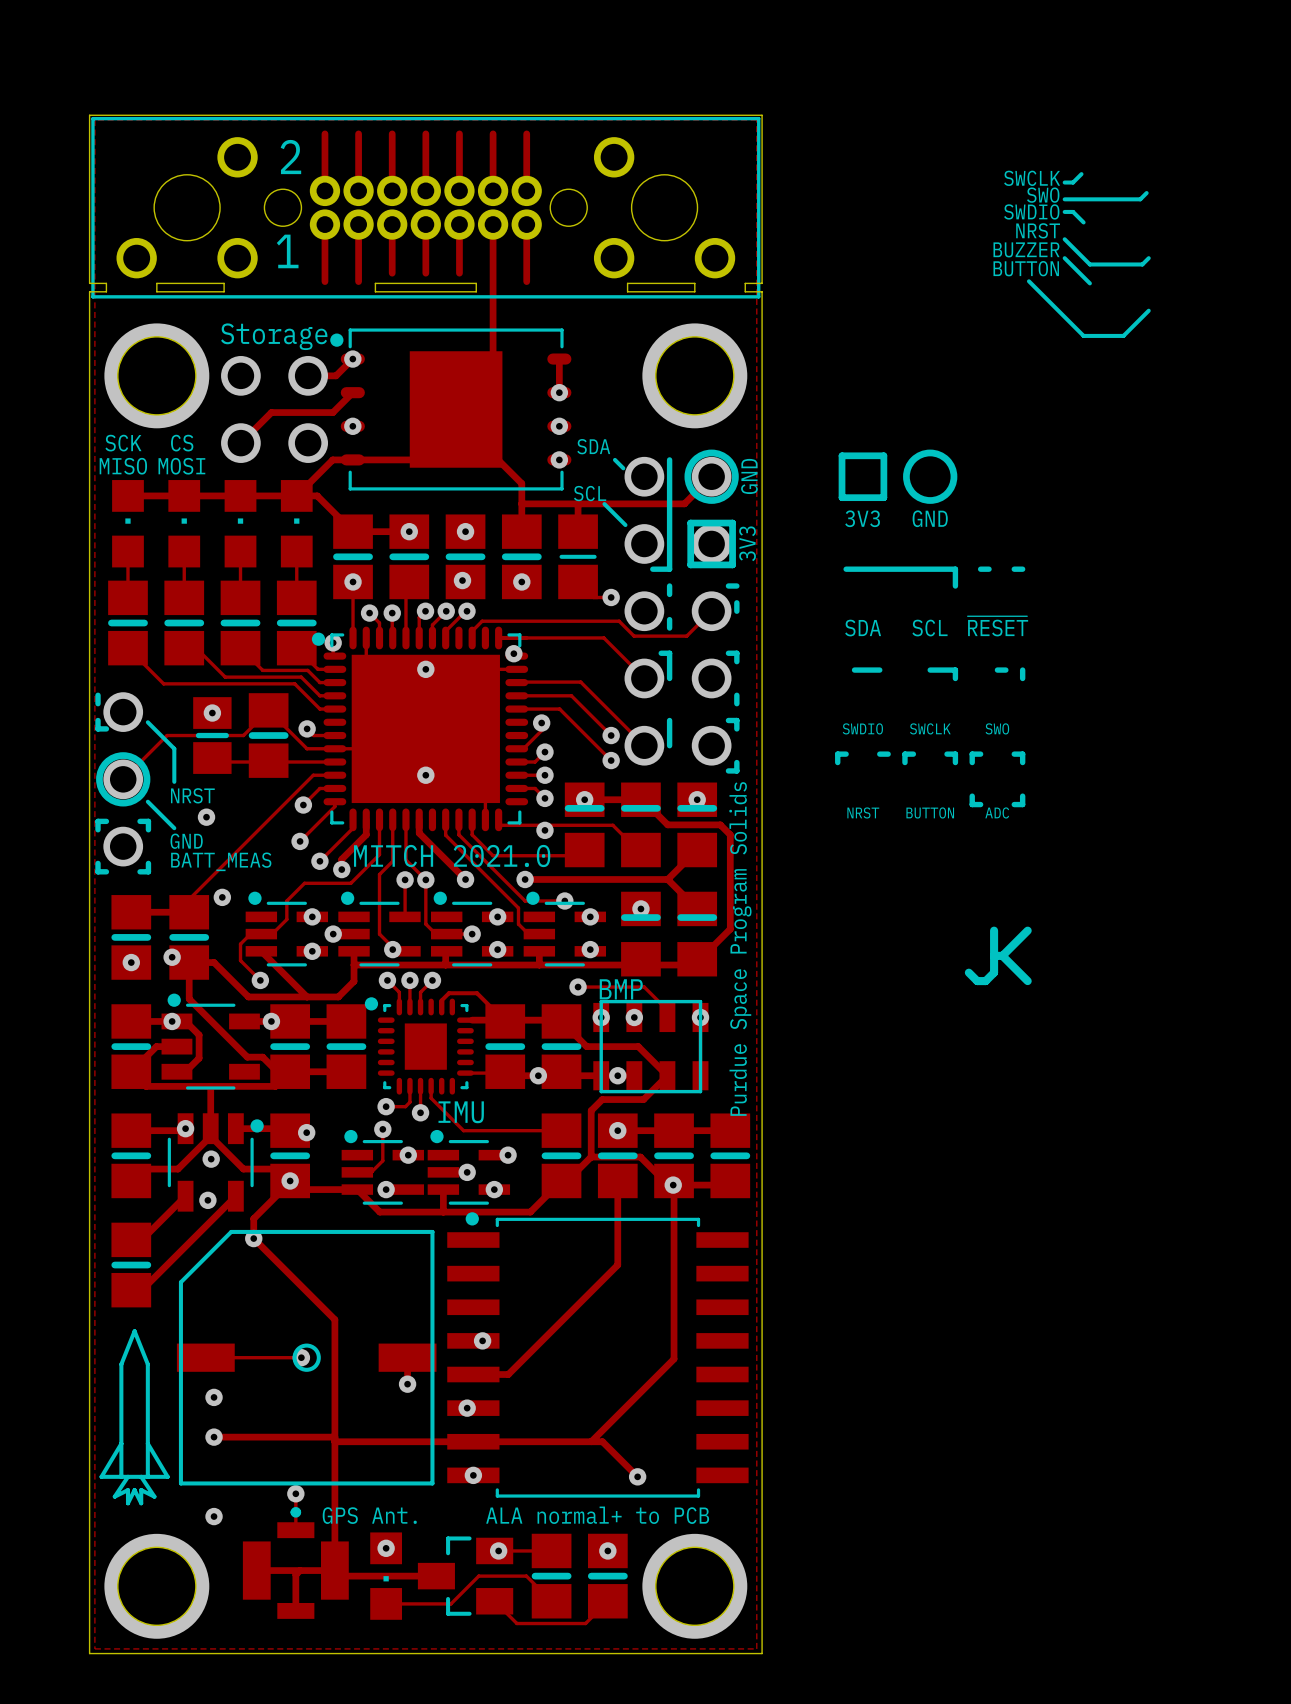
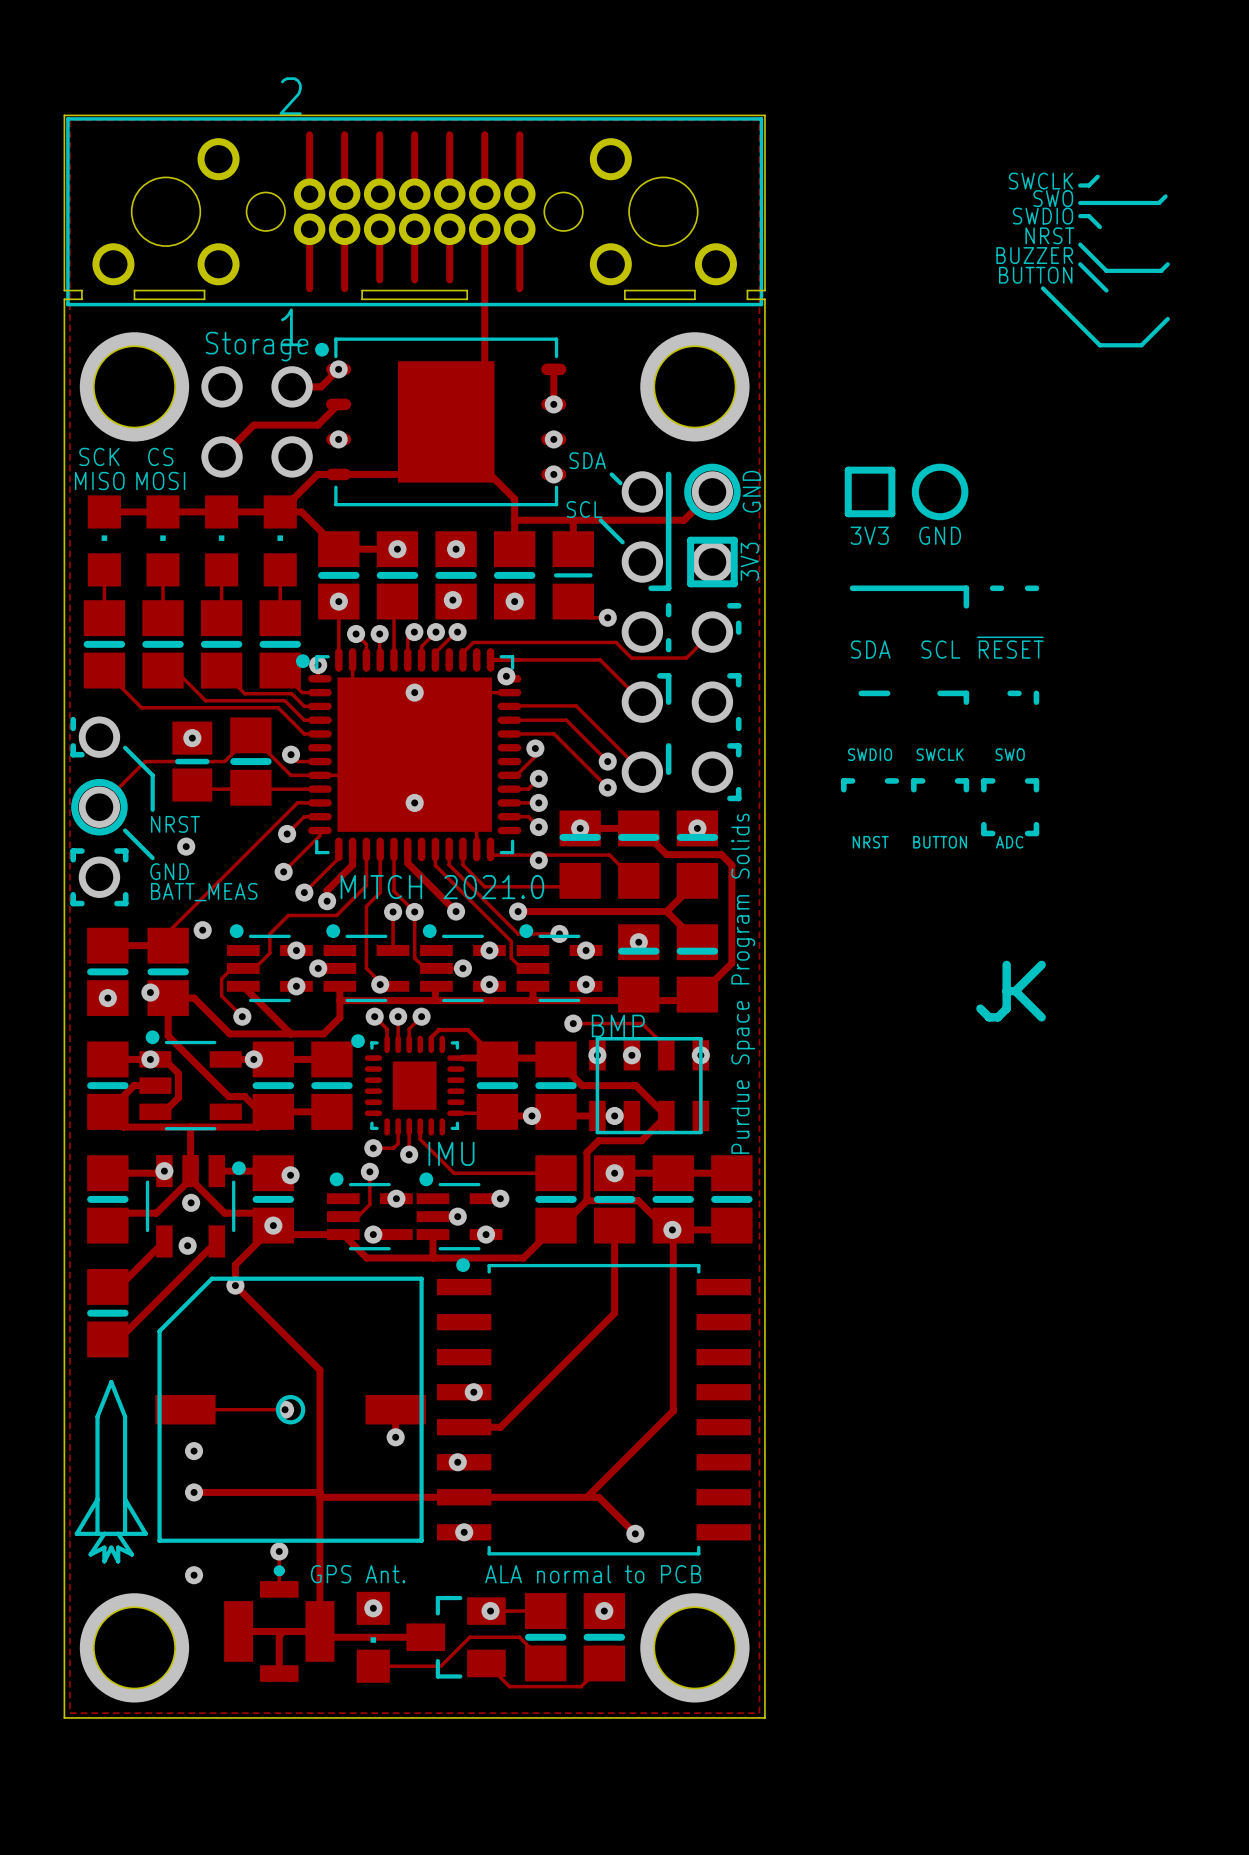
part text position: 2 (290, 157) -> 2 (290, 96)
part text position: 1 (287, 251) -> 1 (291, 327)
text: ALA normal+ to PCB (597, 1515) -> ALA normal to PCB (593, 1574)

